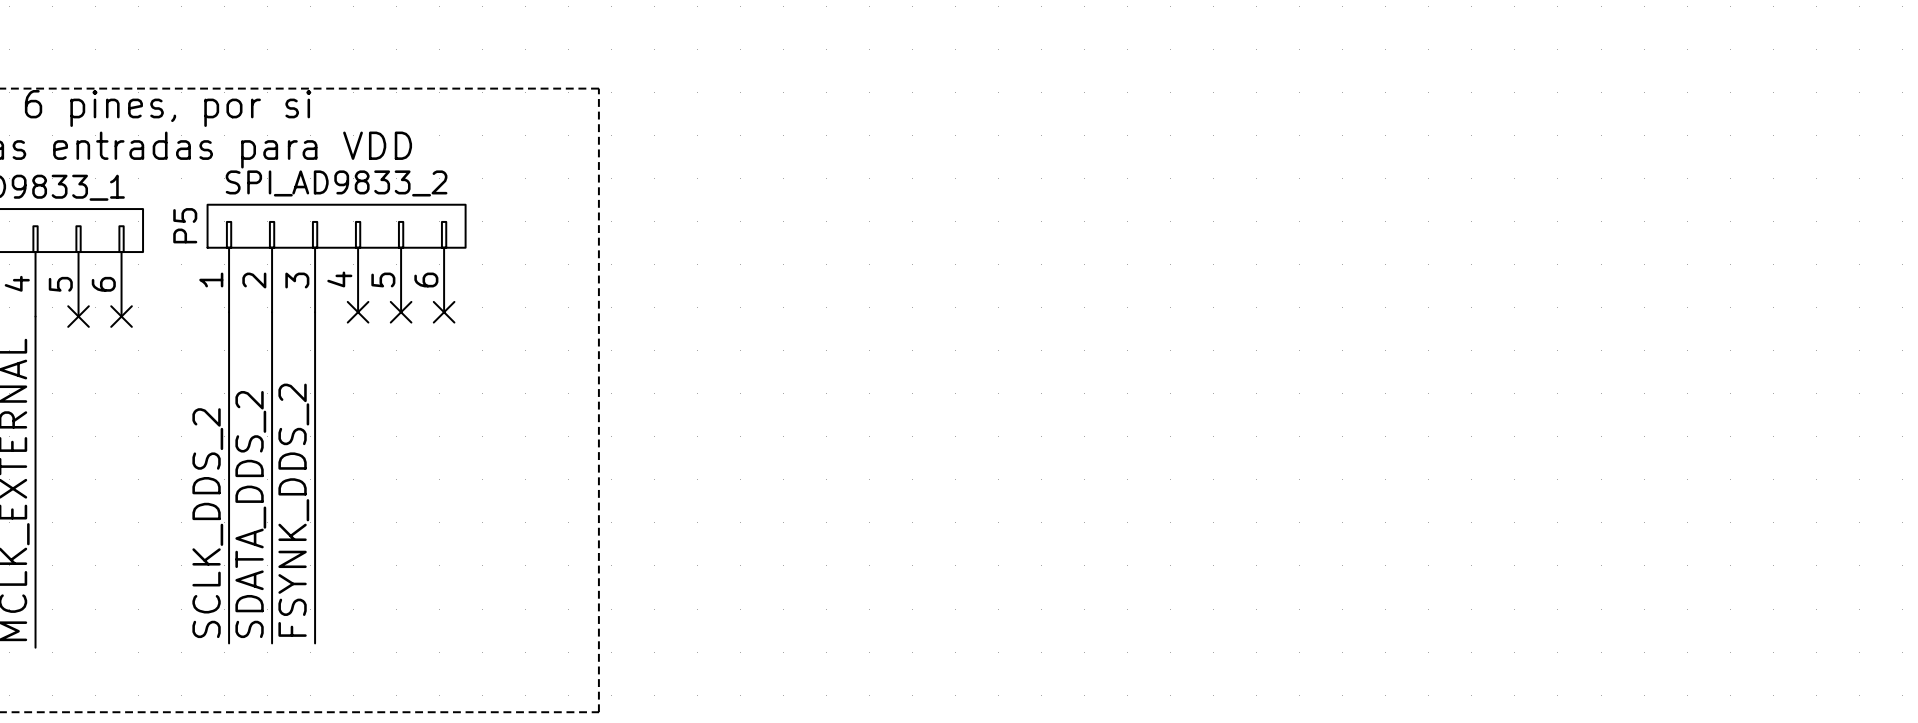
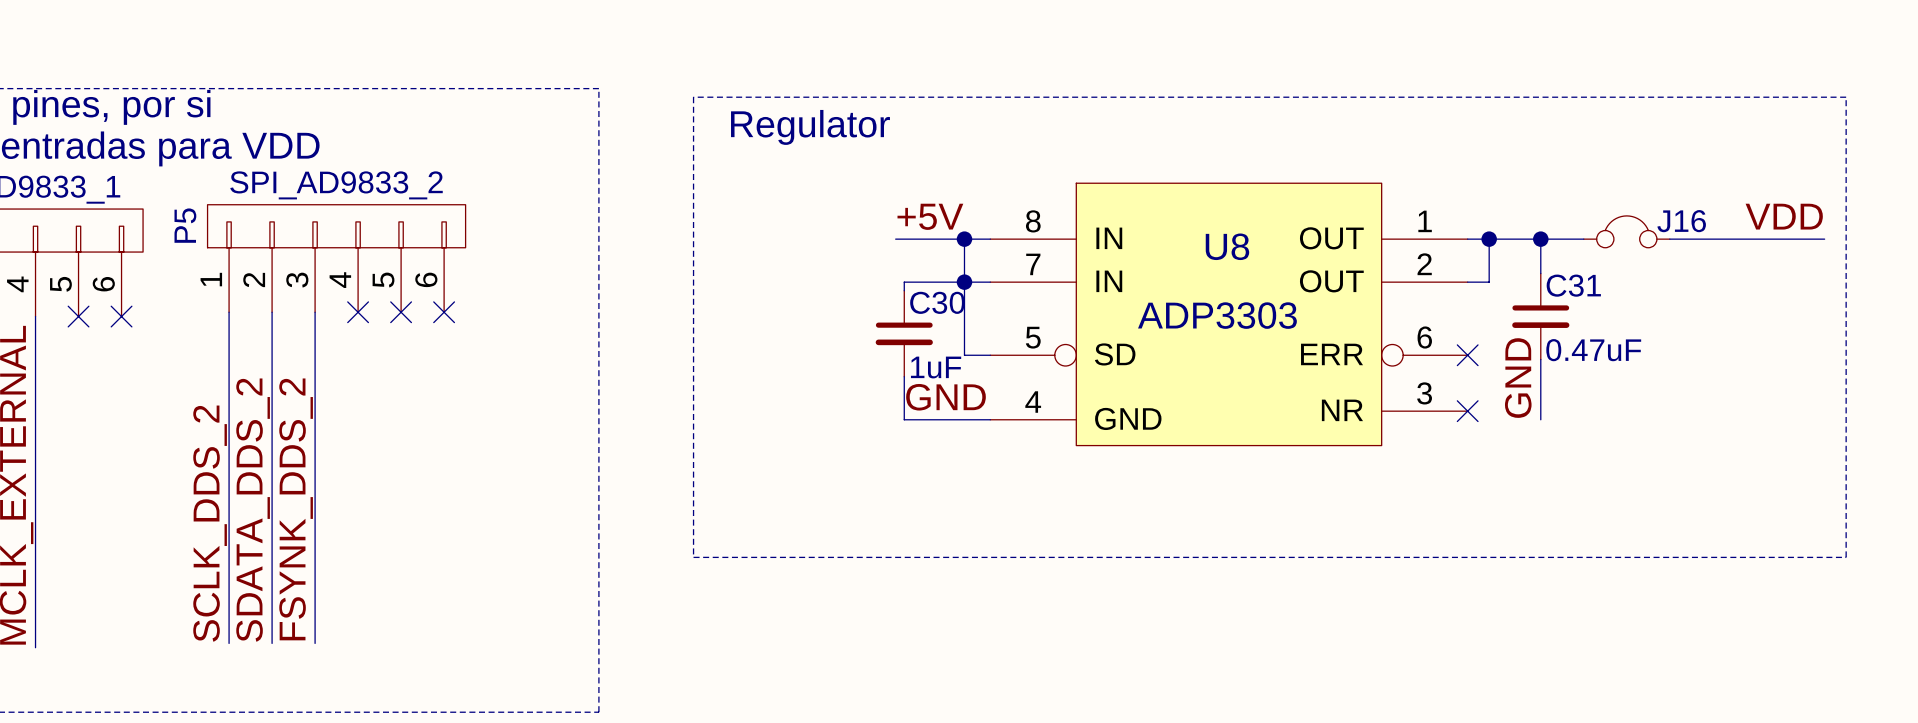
line: none -> (693, 97) (693, 557) (1846, 557) (1846, 97) (693, 97)
text: none -> Regulator (810, 127)
label: none -> +5V (930, 216)
label: none -> VDD (1784, 216)
J16: none -> (1626, 231)
wire: none -> (895, 239) (990, 239)
wire: none -> (964, 239) (964, 355) (990, 355)
junction: none -> (964, 239)
wire: none -> (1467, 239) (1583, 239)
wire: none -> (1489, 239) (1489, 282) (1467, 282)
junction: none -> (1489, 239)
wire: none -> (1540, 239) (1540, 273)
junction: none -> (1540, 239)
wire: none -> (1669, 239) (1824, 239)
junction: none -> (964, 282)
wire: none -> (990, 282) (904, 282) (904, 290)
U8: none -> ADP3303 (1228, 314)
C31: none -> 0.47uF (1540, 316)
C30: none -> 1uF (904, 333)
no-connect mark: none -> (1467, 355)
wire: none -> (1540, 359) (1540, 419)
wire: none -> (904, 376) (904, 419) (990, 419)
label: none -> GND (1518, 378)
label: none -> GND (946, 397)
no-connect mark: none -> (1467, 411)

